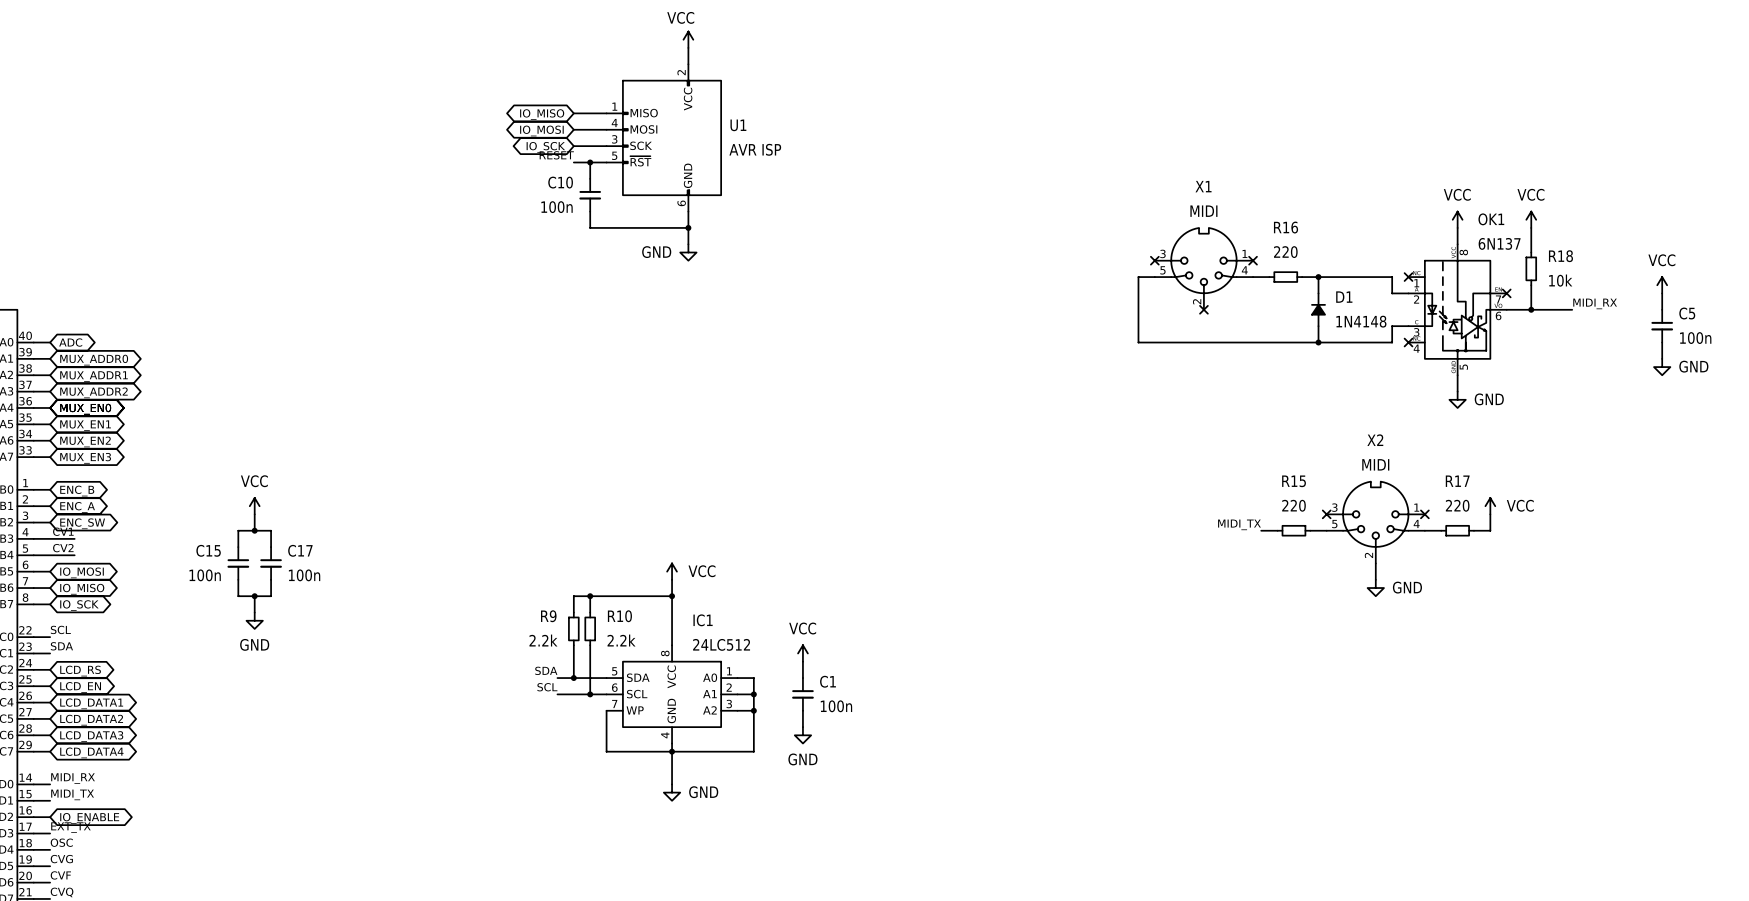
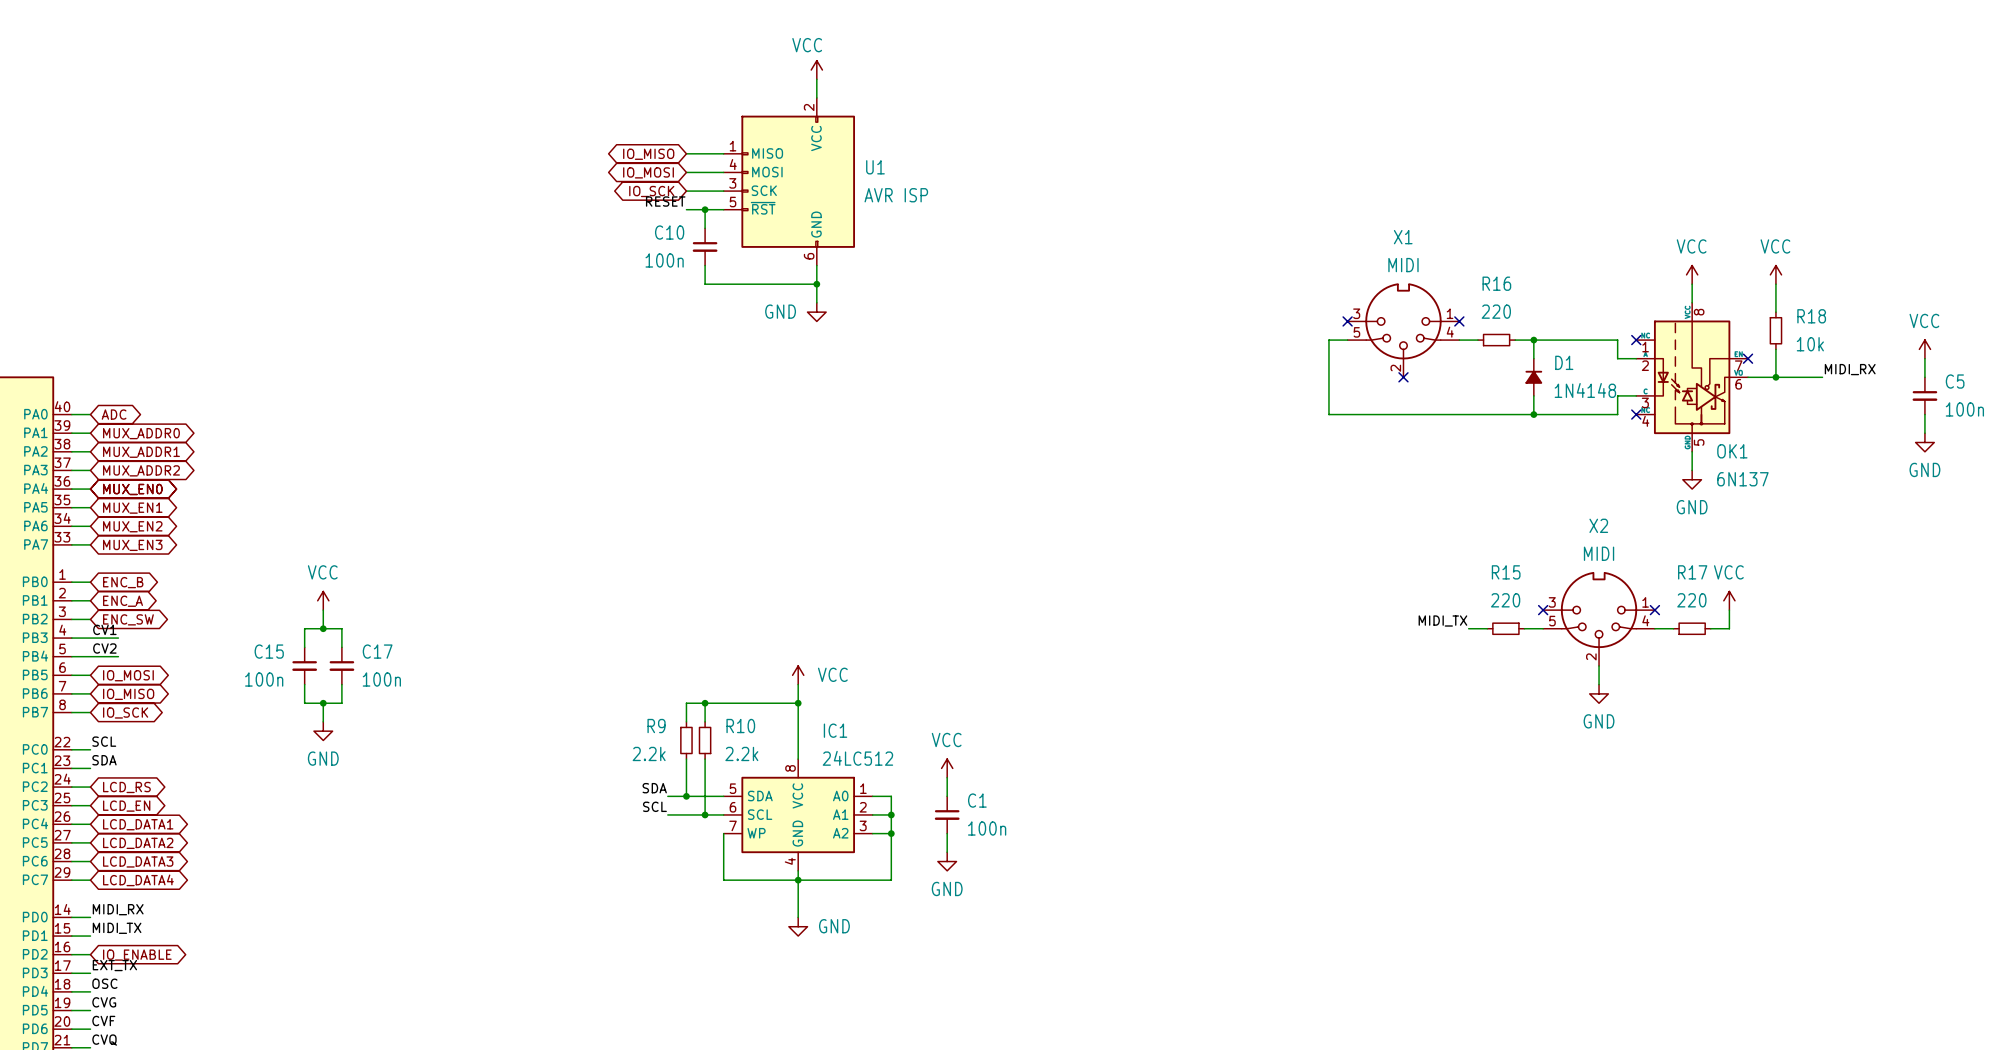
OK1 name position: OK1 (1491, 219) -> OK1 (1732, 451)
OK1 value position: 6N137 (1499, 243) -> 6N137 (1742, 479)
power symbol text position: GND (1693, 366) -> GND (1924, 469)
power symbol text position: GND (1489, 399) -> GND (1692, 507)
power symbol text position: VCC (1520, 505) -> VCC (1728, 572)
power symbol text position: GND (1407, 587) -> GND (1599, 721)

